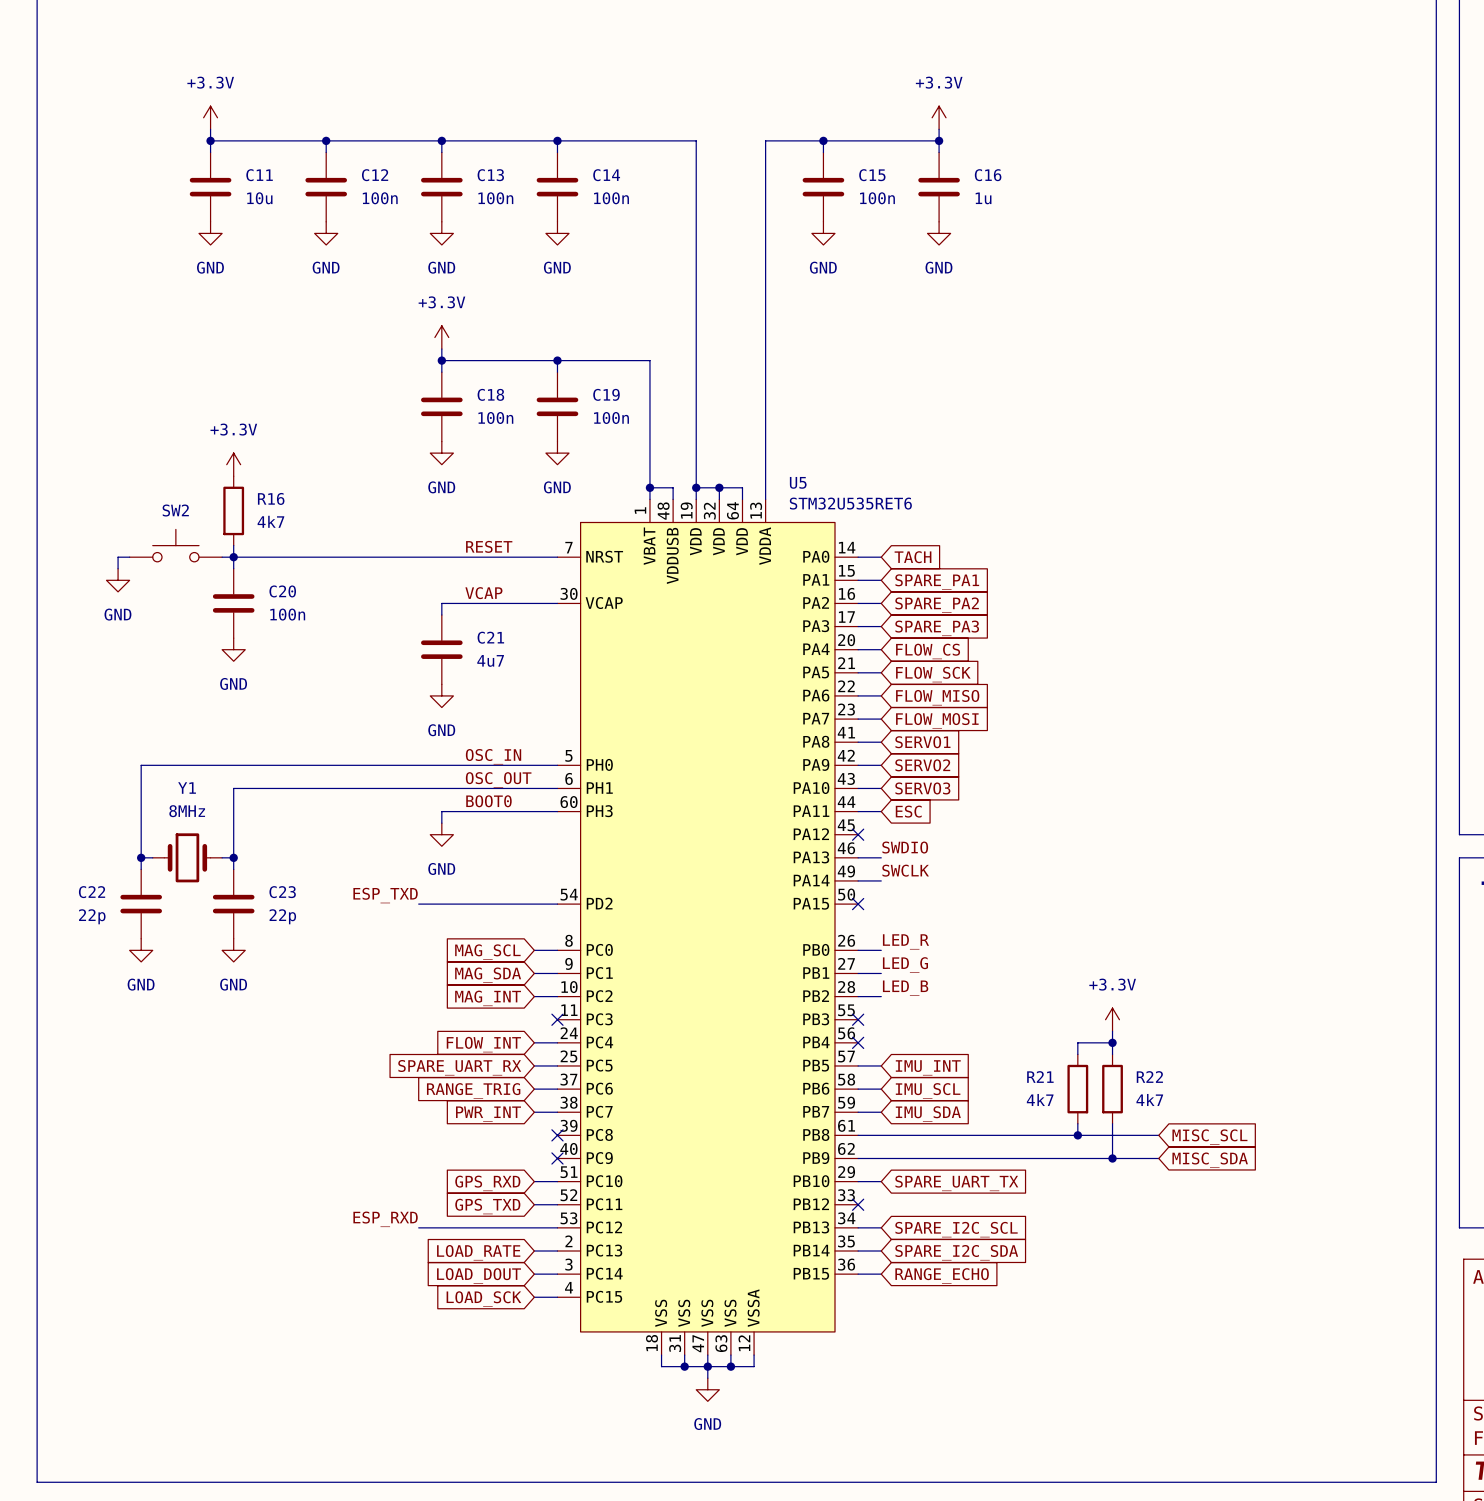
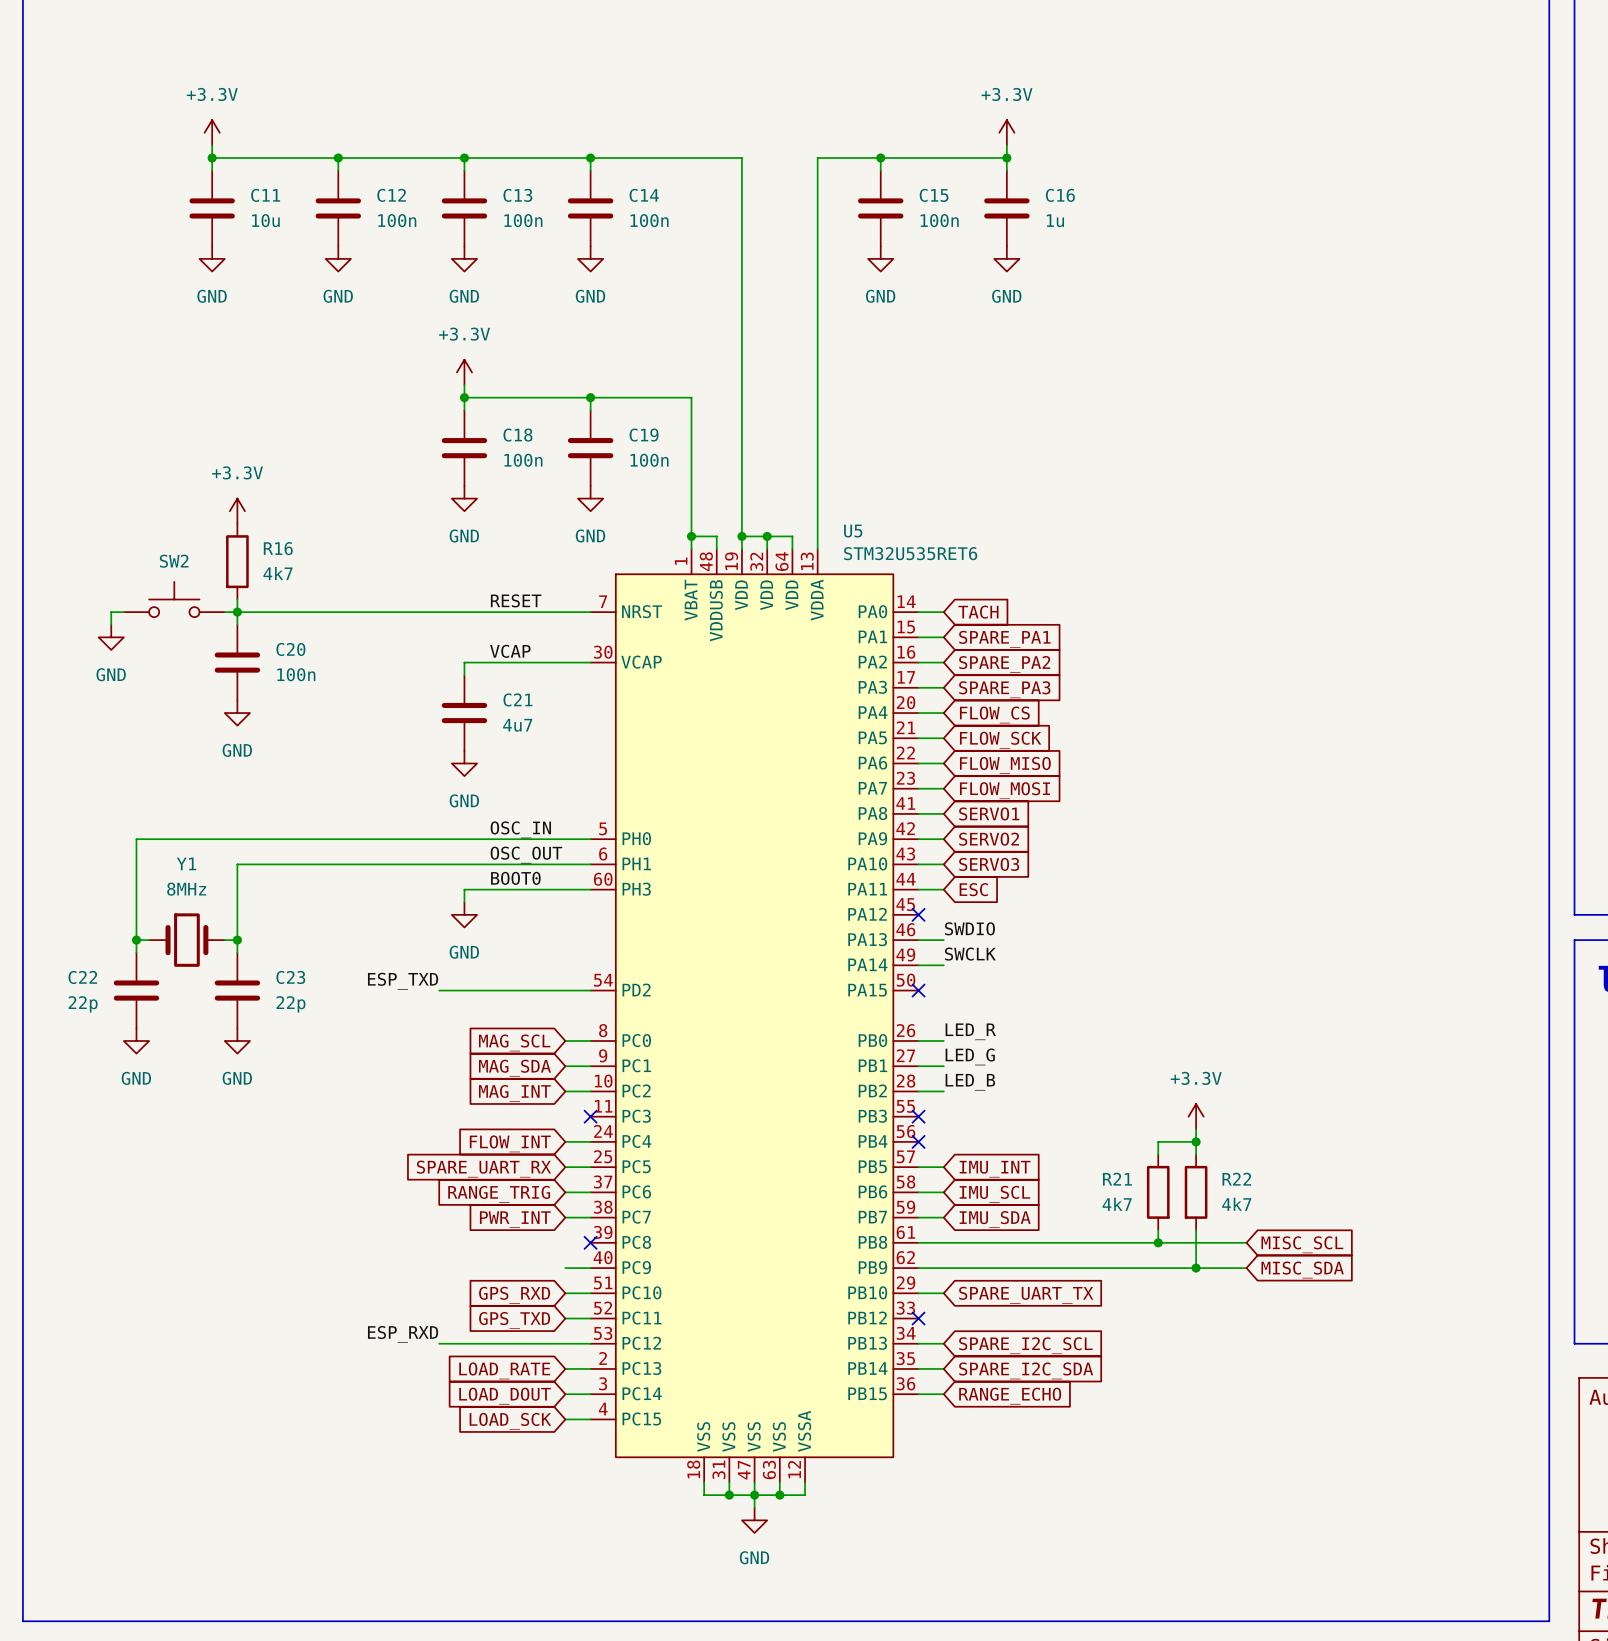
wire: none -> (565, 1268) (590, 1268)
no-connect mark: (557, 1158) -> none

